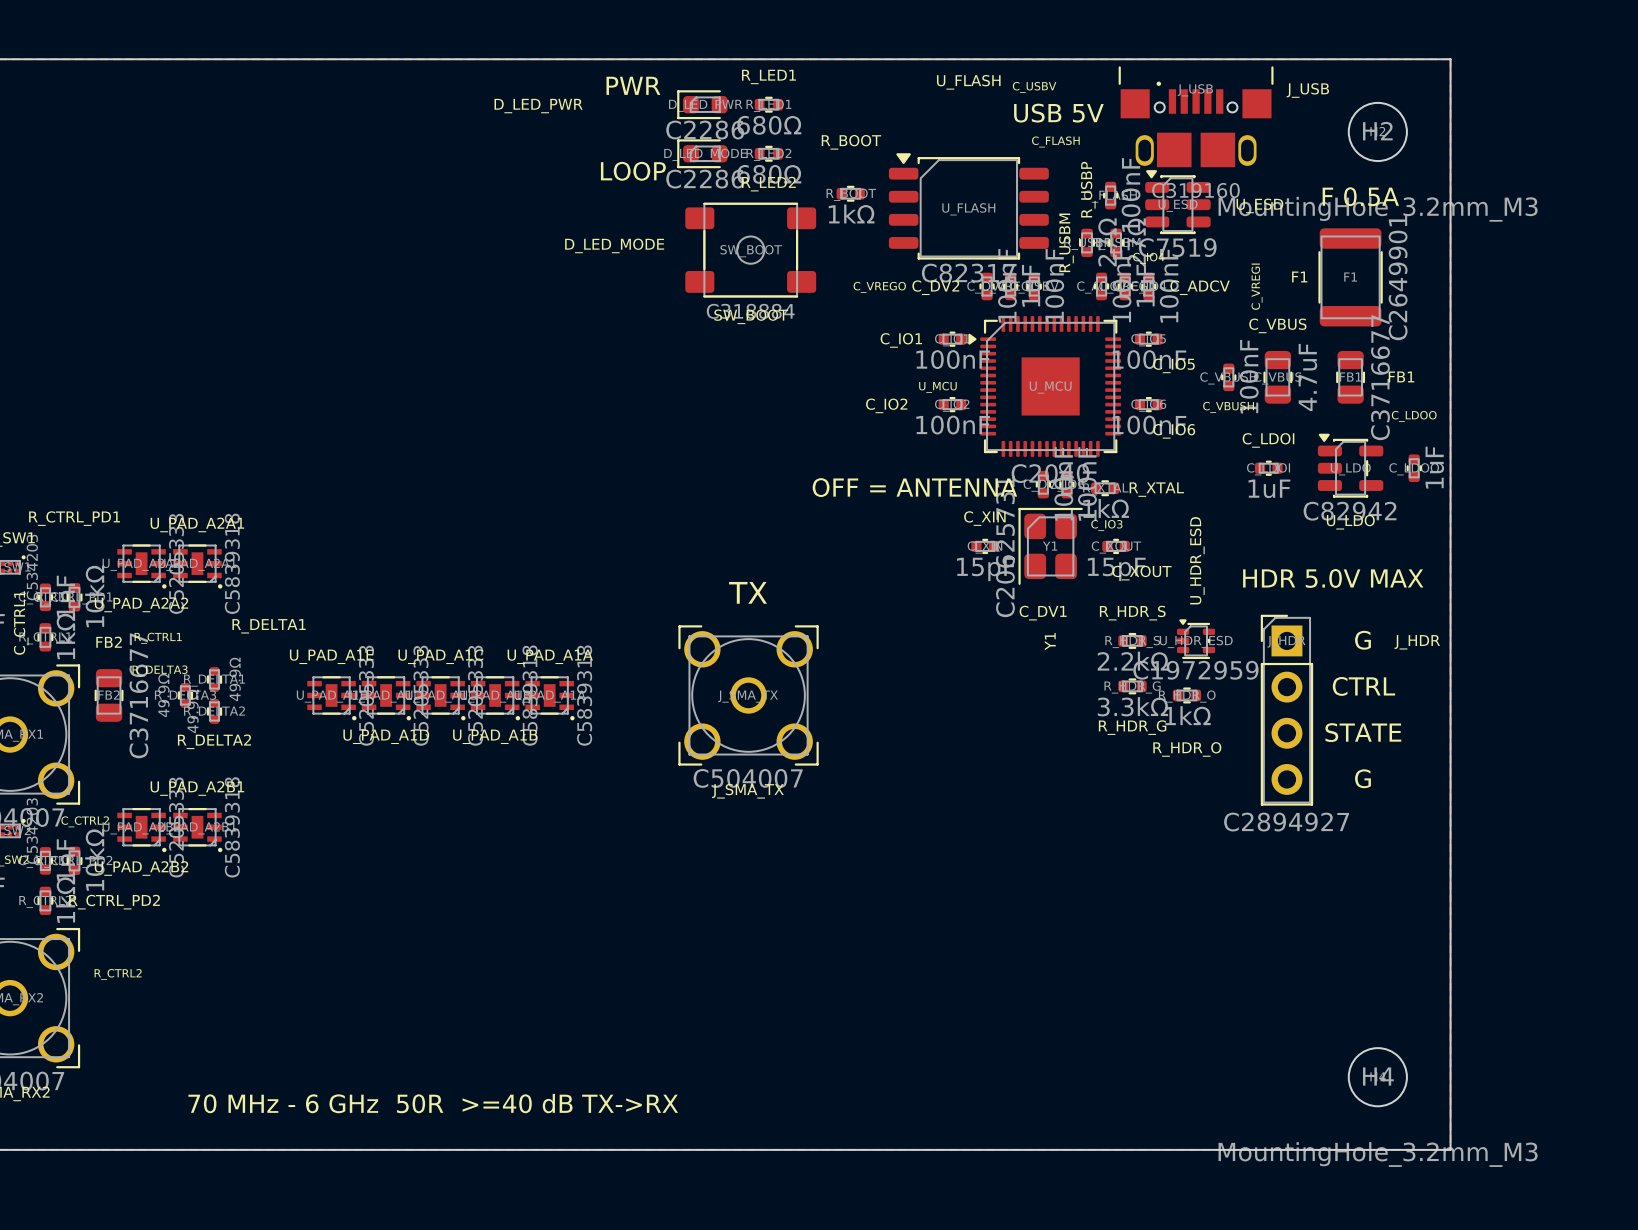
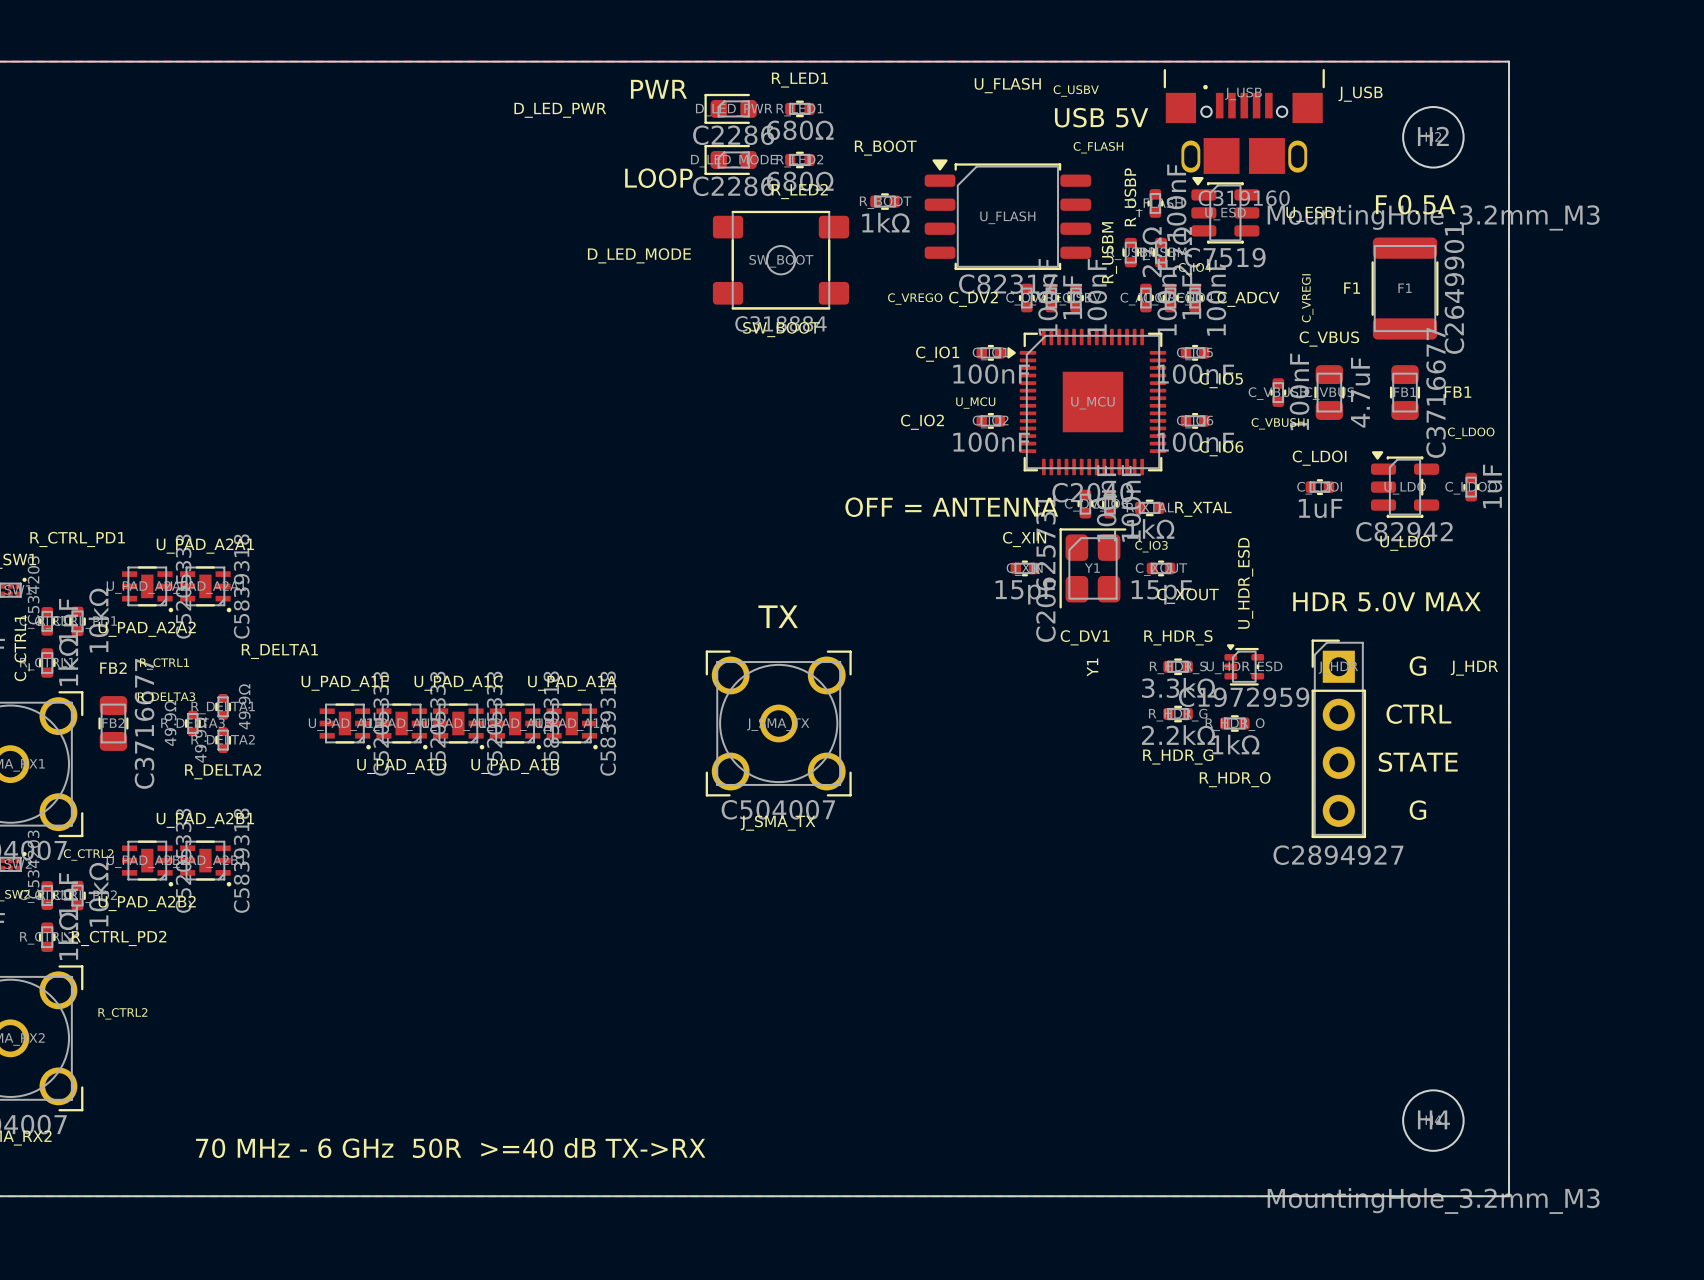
R_HDR_S value: 2.2kΩ (1132, 661) -> 3.3kΩ (1178, 687)
R_HDR_G value: 3.3kΩ (1132, 706) -> 2.2kΩ (1178, 735)

